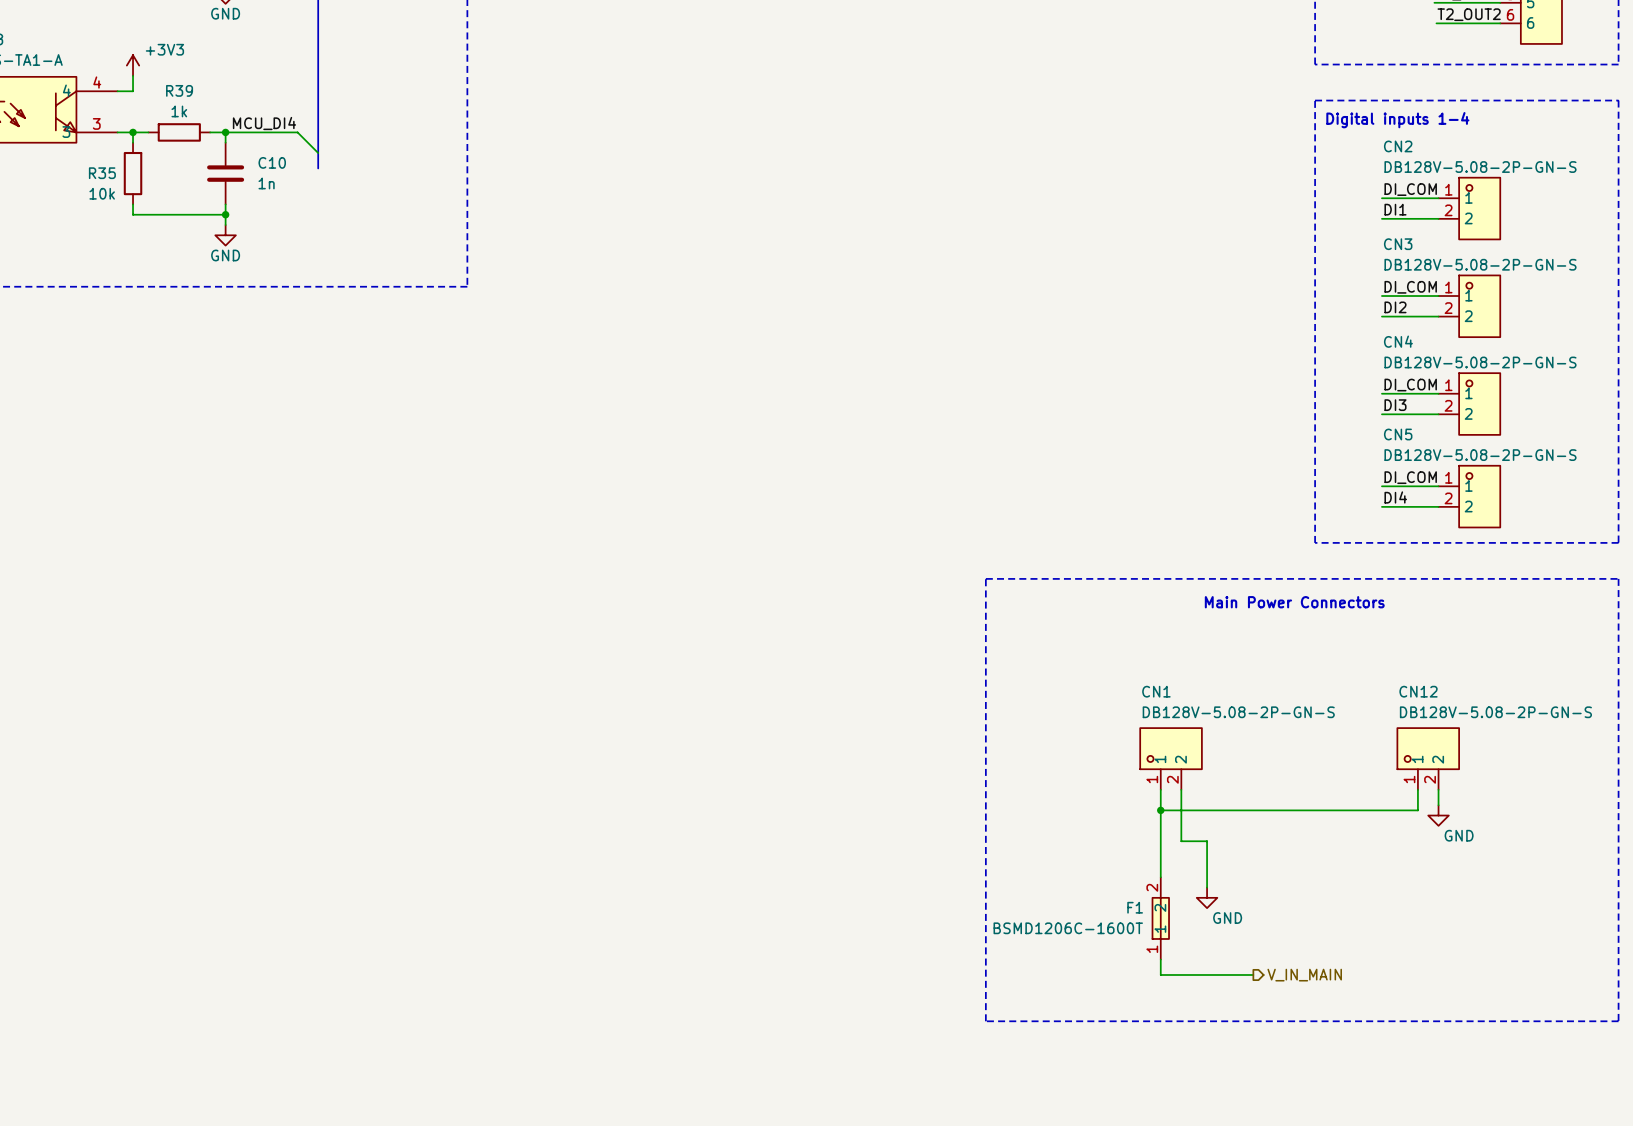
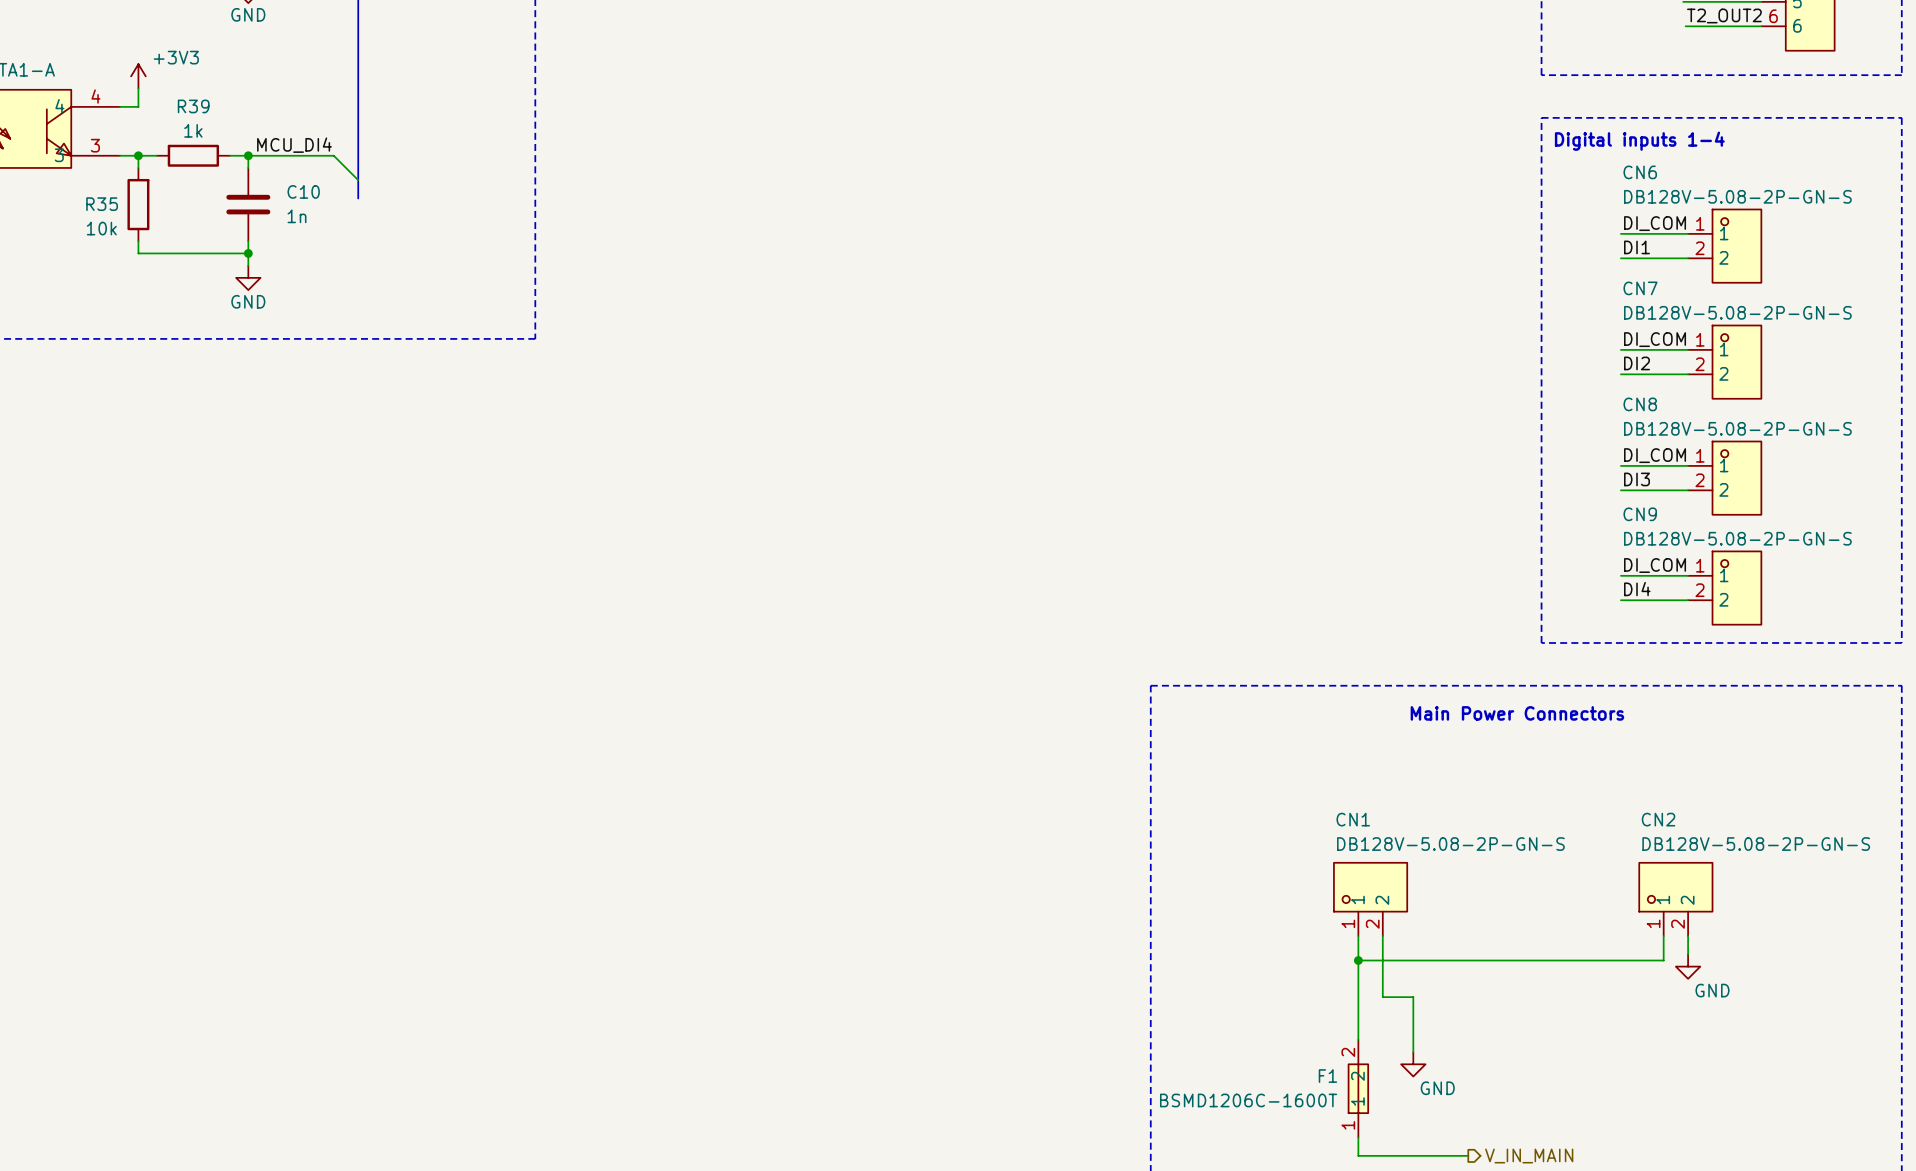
CN2 name: CN2 (1398, 146) -> CN6 (1640, 172)
CN3 name: CN3 (1398, 244) -> CN7 (1640, 288)
CN4 name: CN4 (1398, 341) -> CN8 (1640, 404)
CN5 name: CN5 (1398, 434) -> CN9 (1640, 514)
CN12 name: CN12 (1418, 691) -> CN2 (1658, 819)

